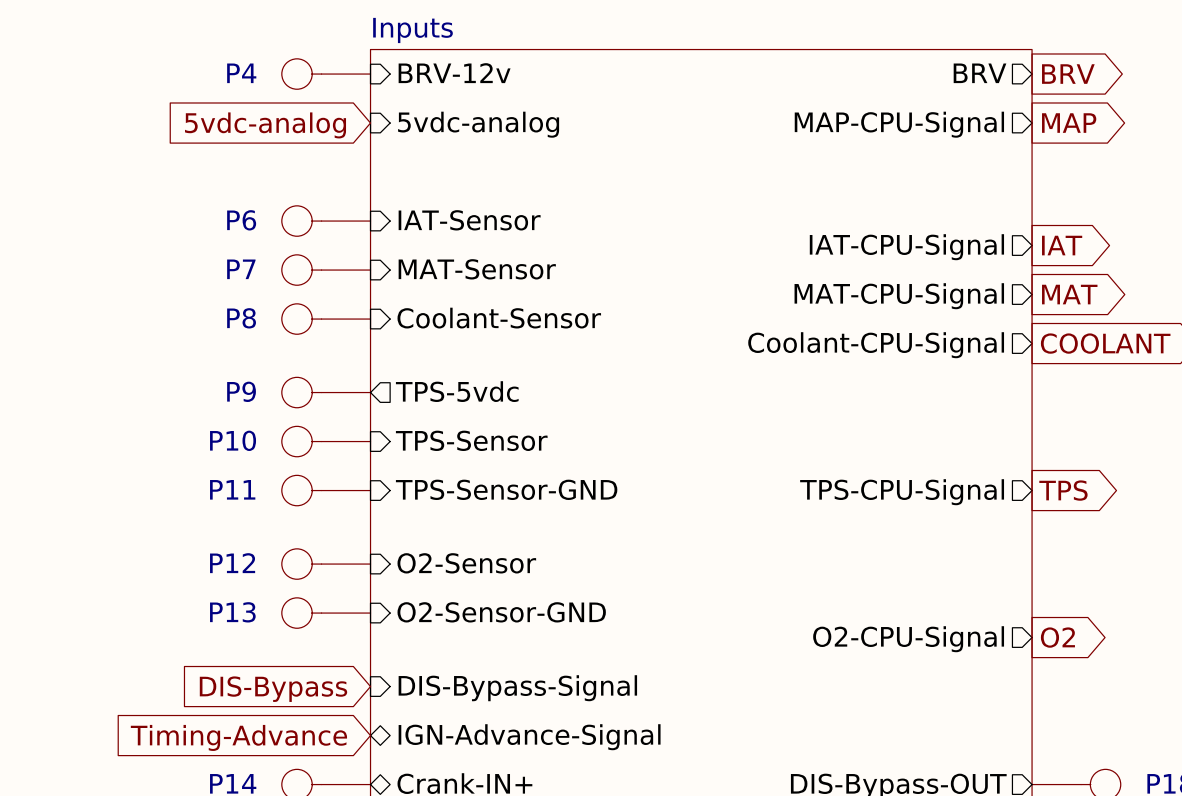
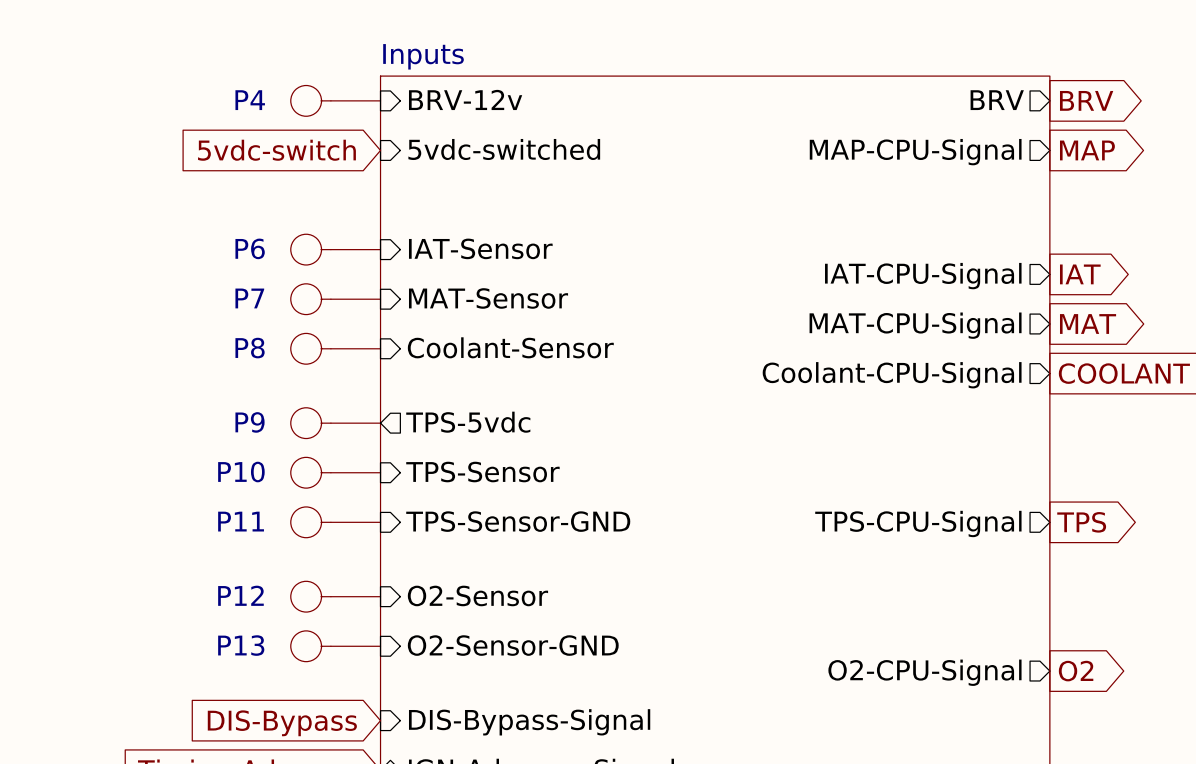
sheet pin: 5vdc-analog (478, 124) -> 5vdc-switched (504, 149)
global label: 5vdc-analog (265, 125) -> 5vdc-switch (276, 150)

